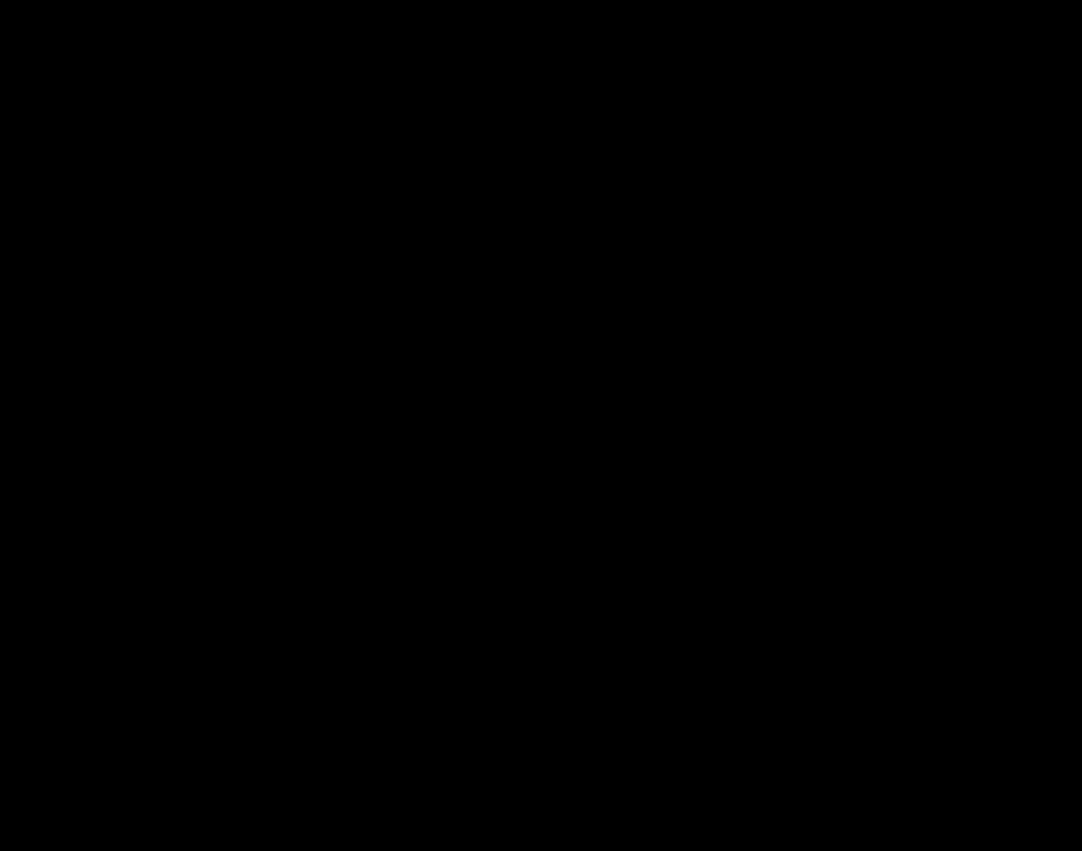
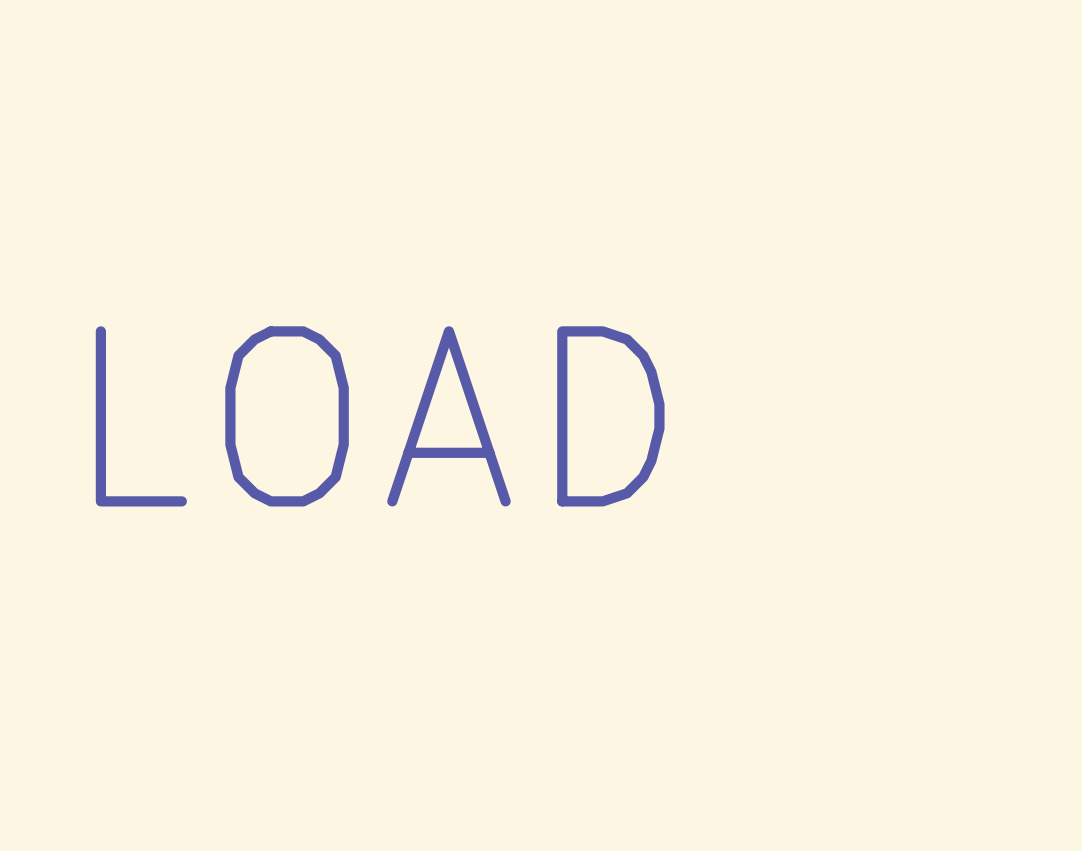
text: none -> LOAD (380, 416)

